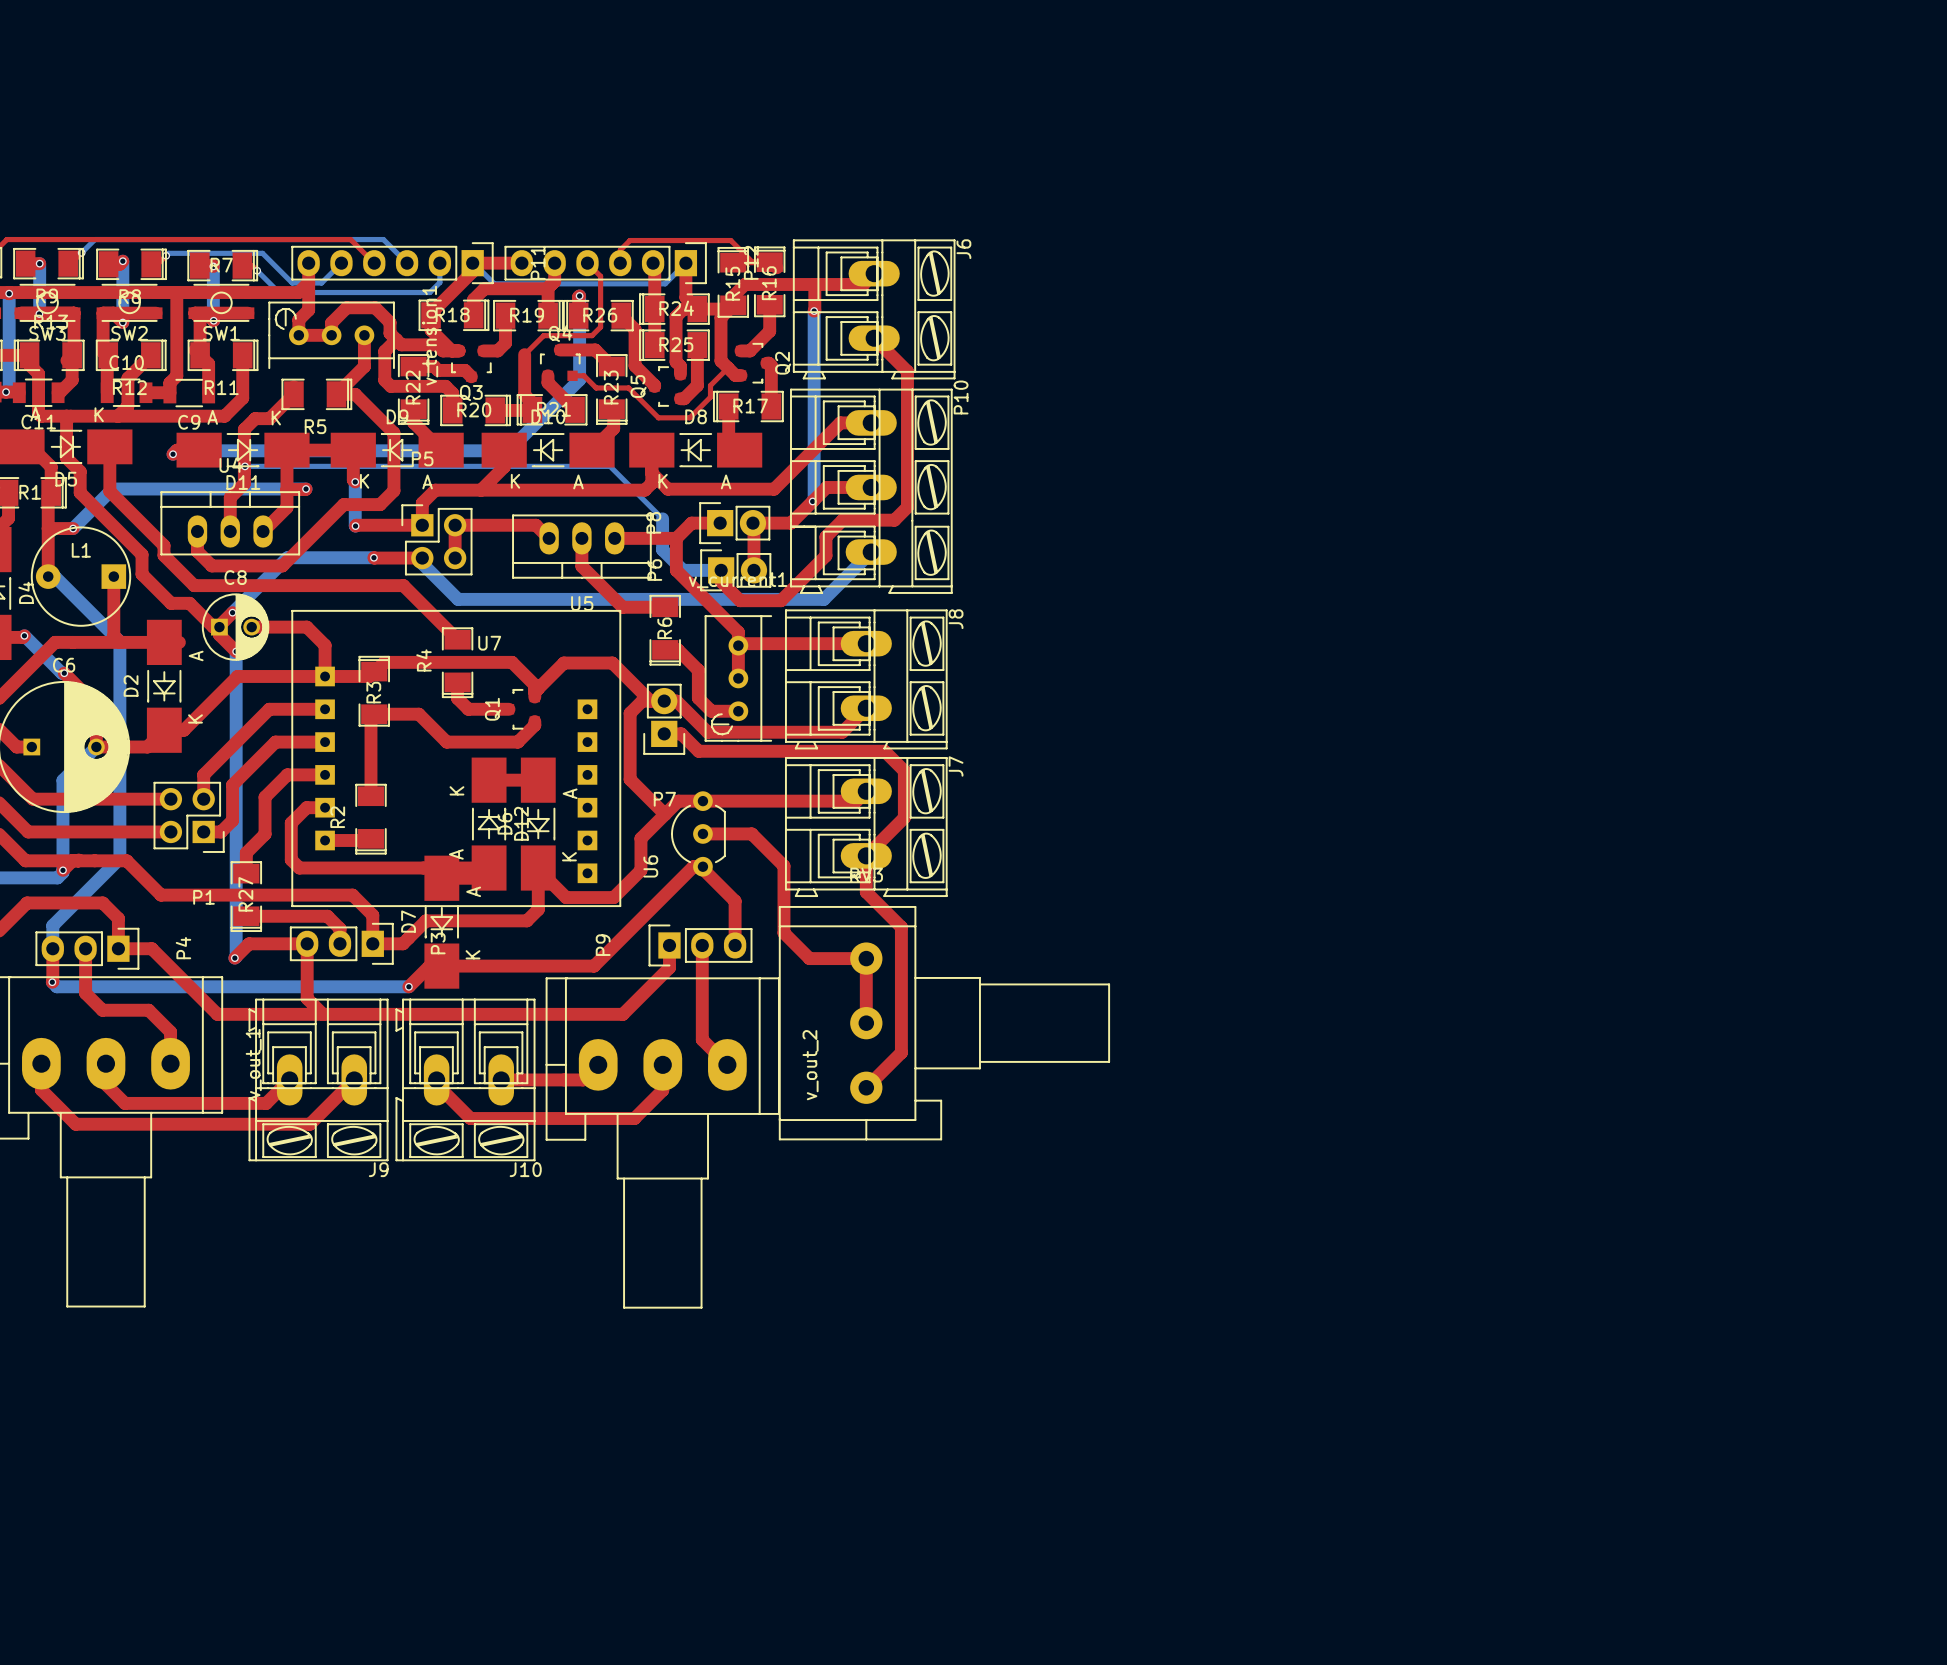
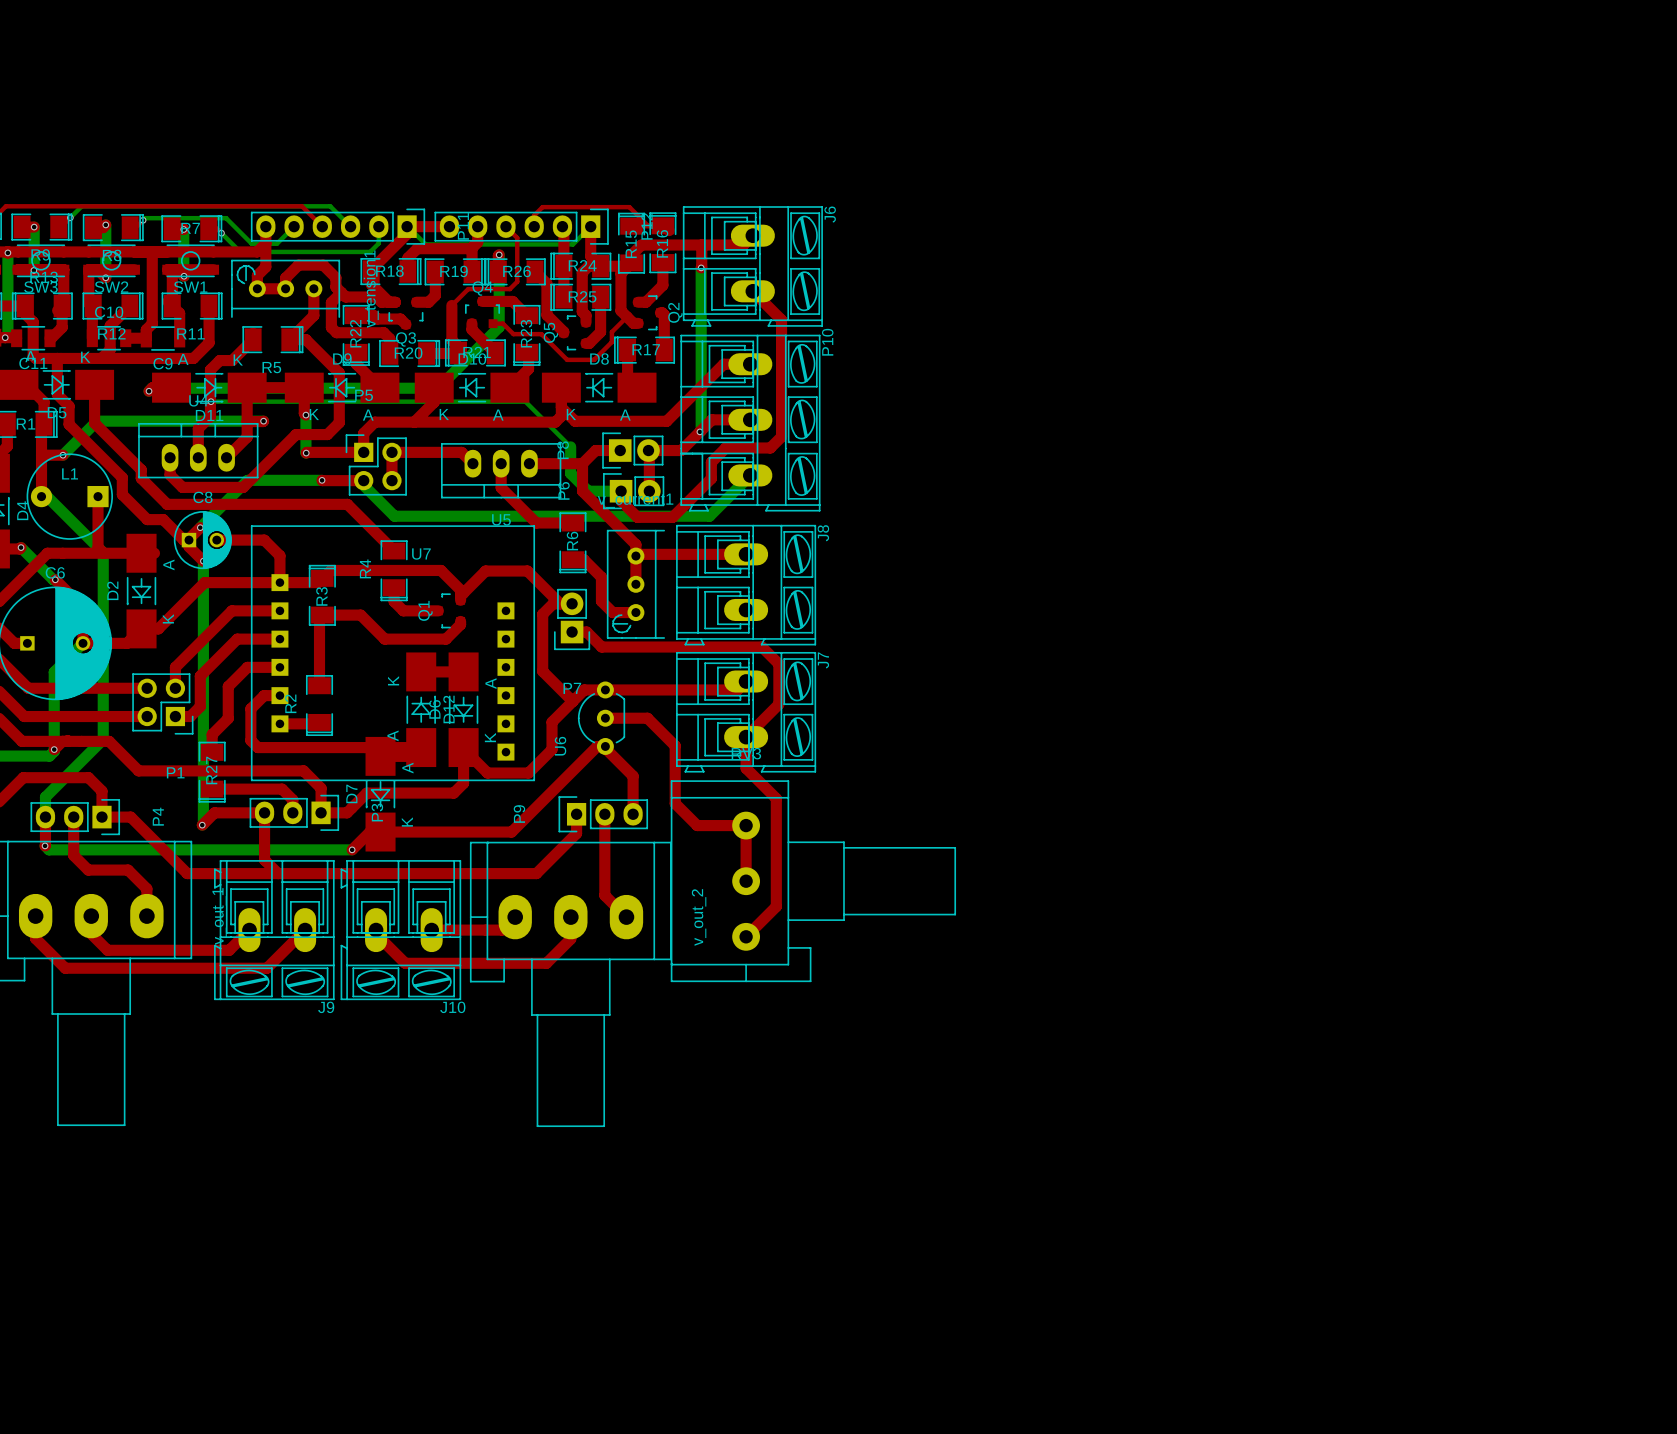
top track: (664, 701) (676, 701) (707, 732) (842, 732) (866, 708) -> none

